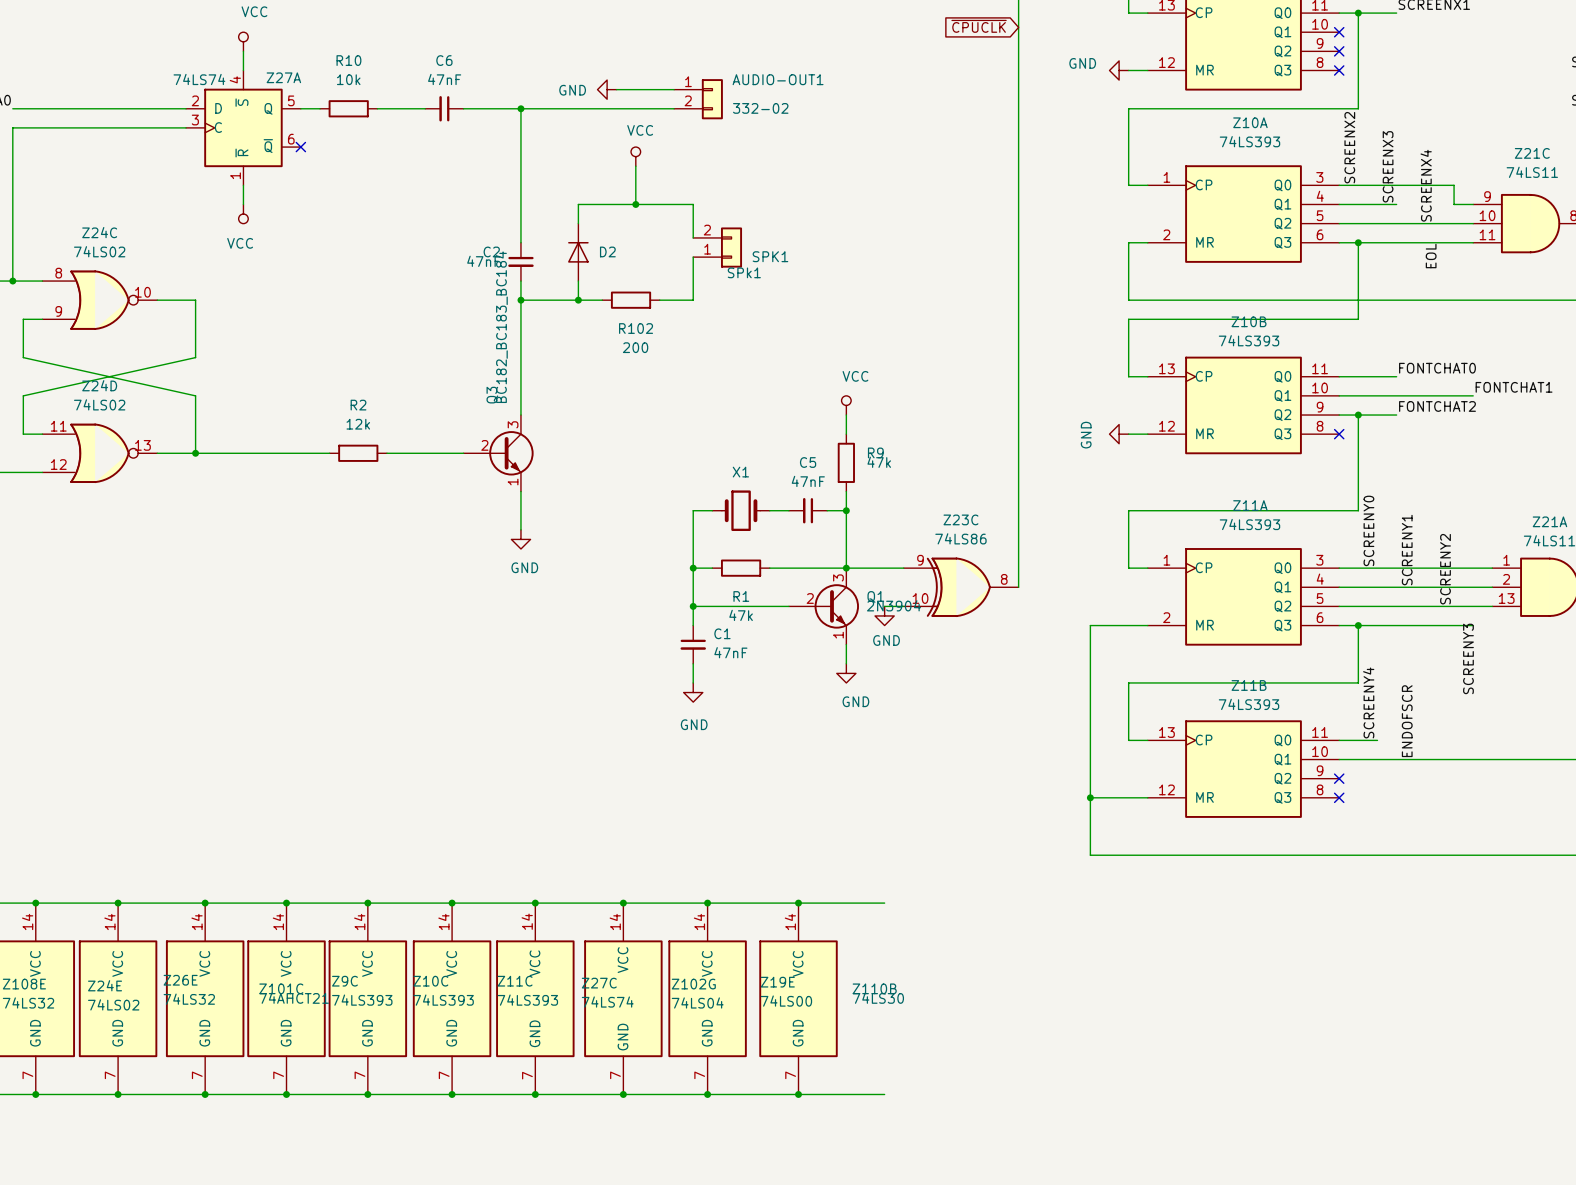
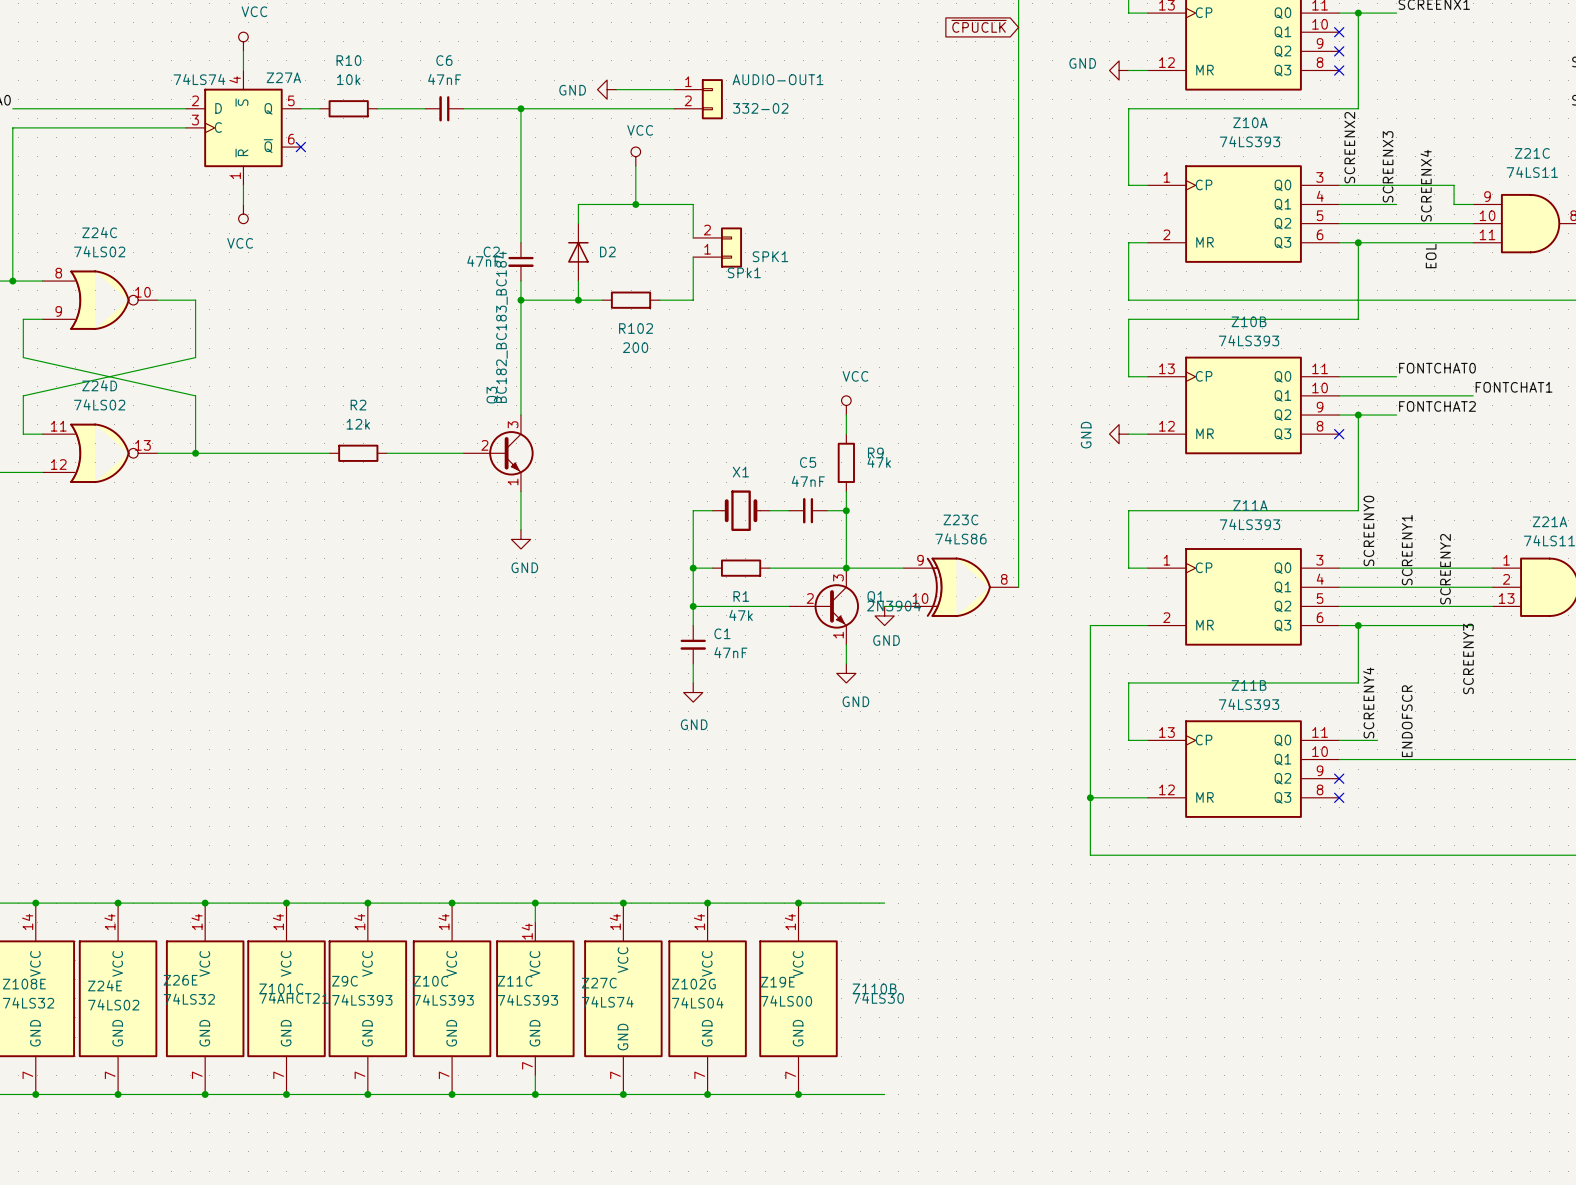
Z27C symbol: [496, 903, 575, 1095] -> [496, 922, 575, 1076]

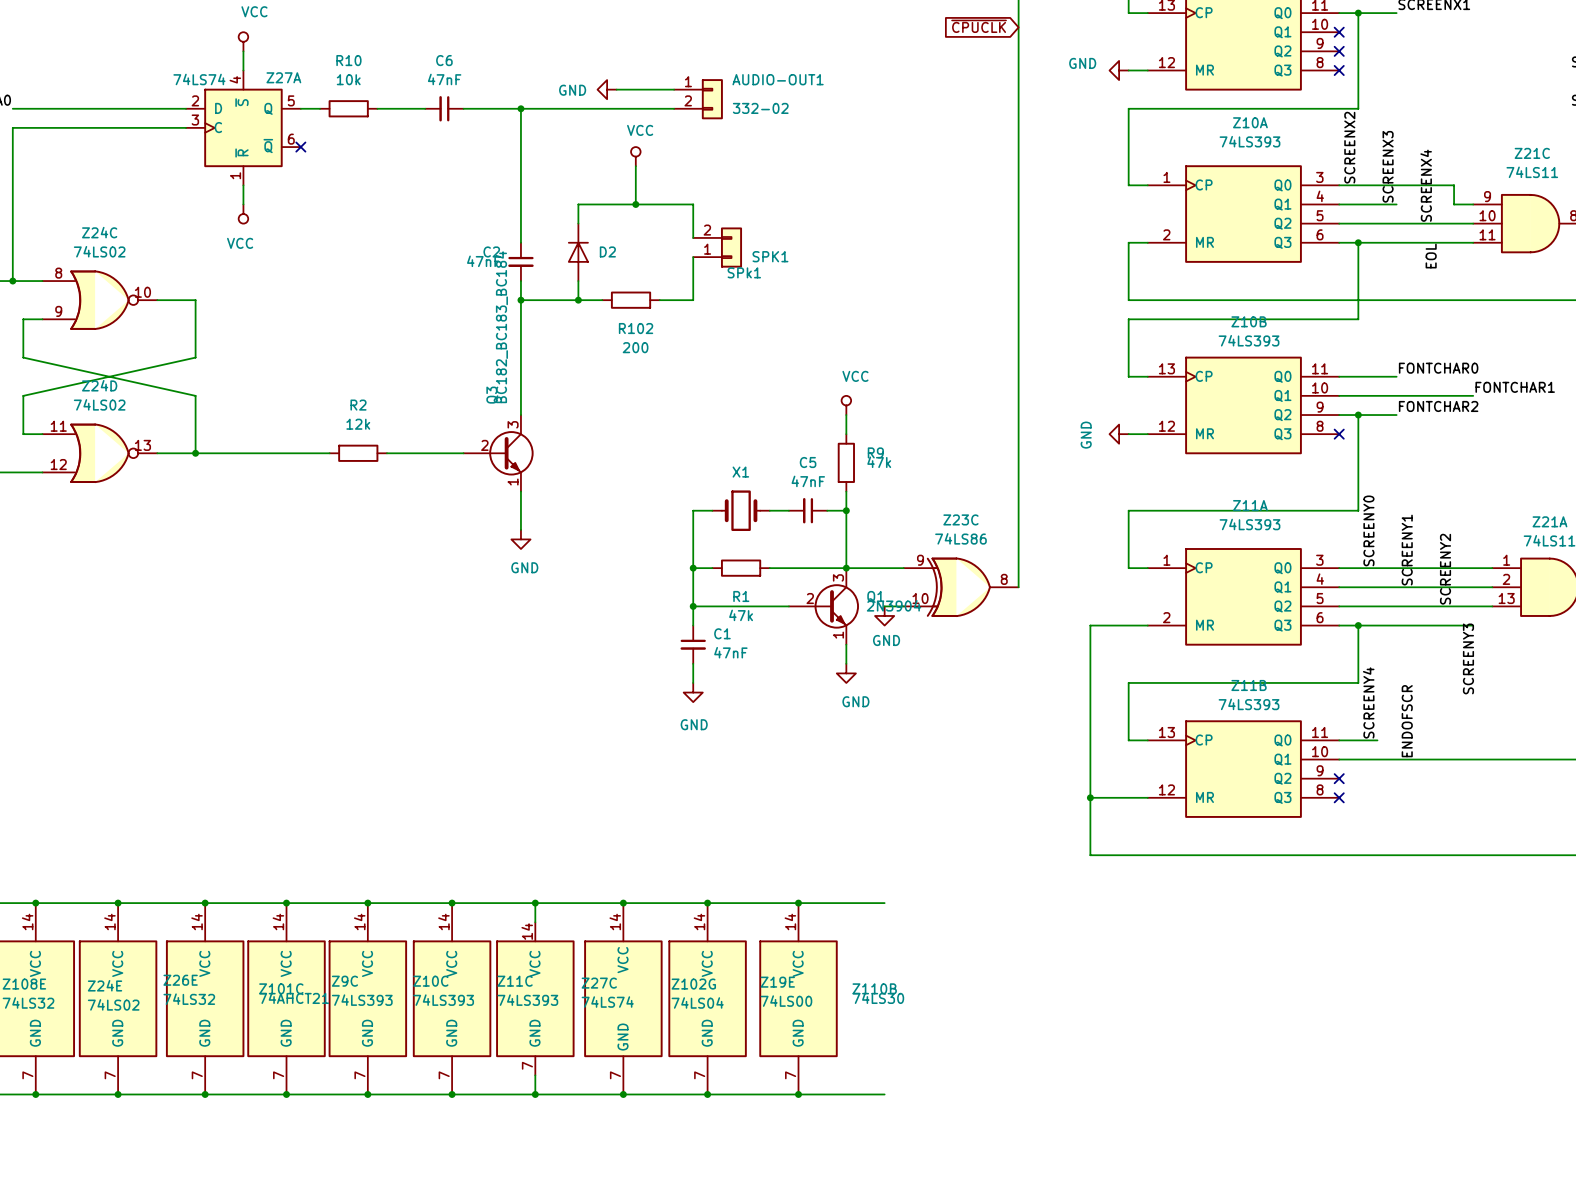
label: FONTCHAT0 (1437, 368) -> FONTCHAR0 (1438, 368)
label: FONTCHAT1 (1514, 387) -> FONTCHAR1 (1515, 387)
label: FONTCHAT2 (1437, 406) -> FONTCHAR2 (1438, 406)

